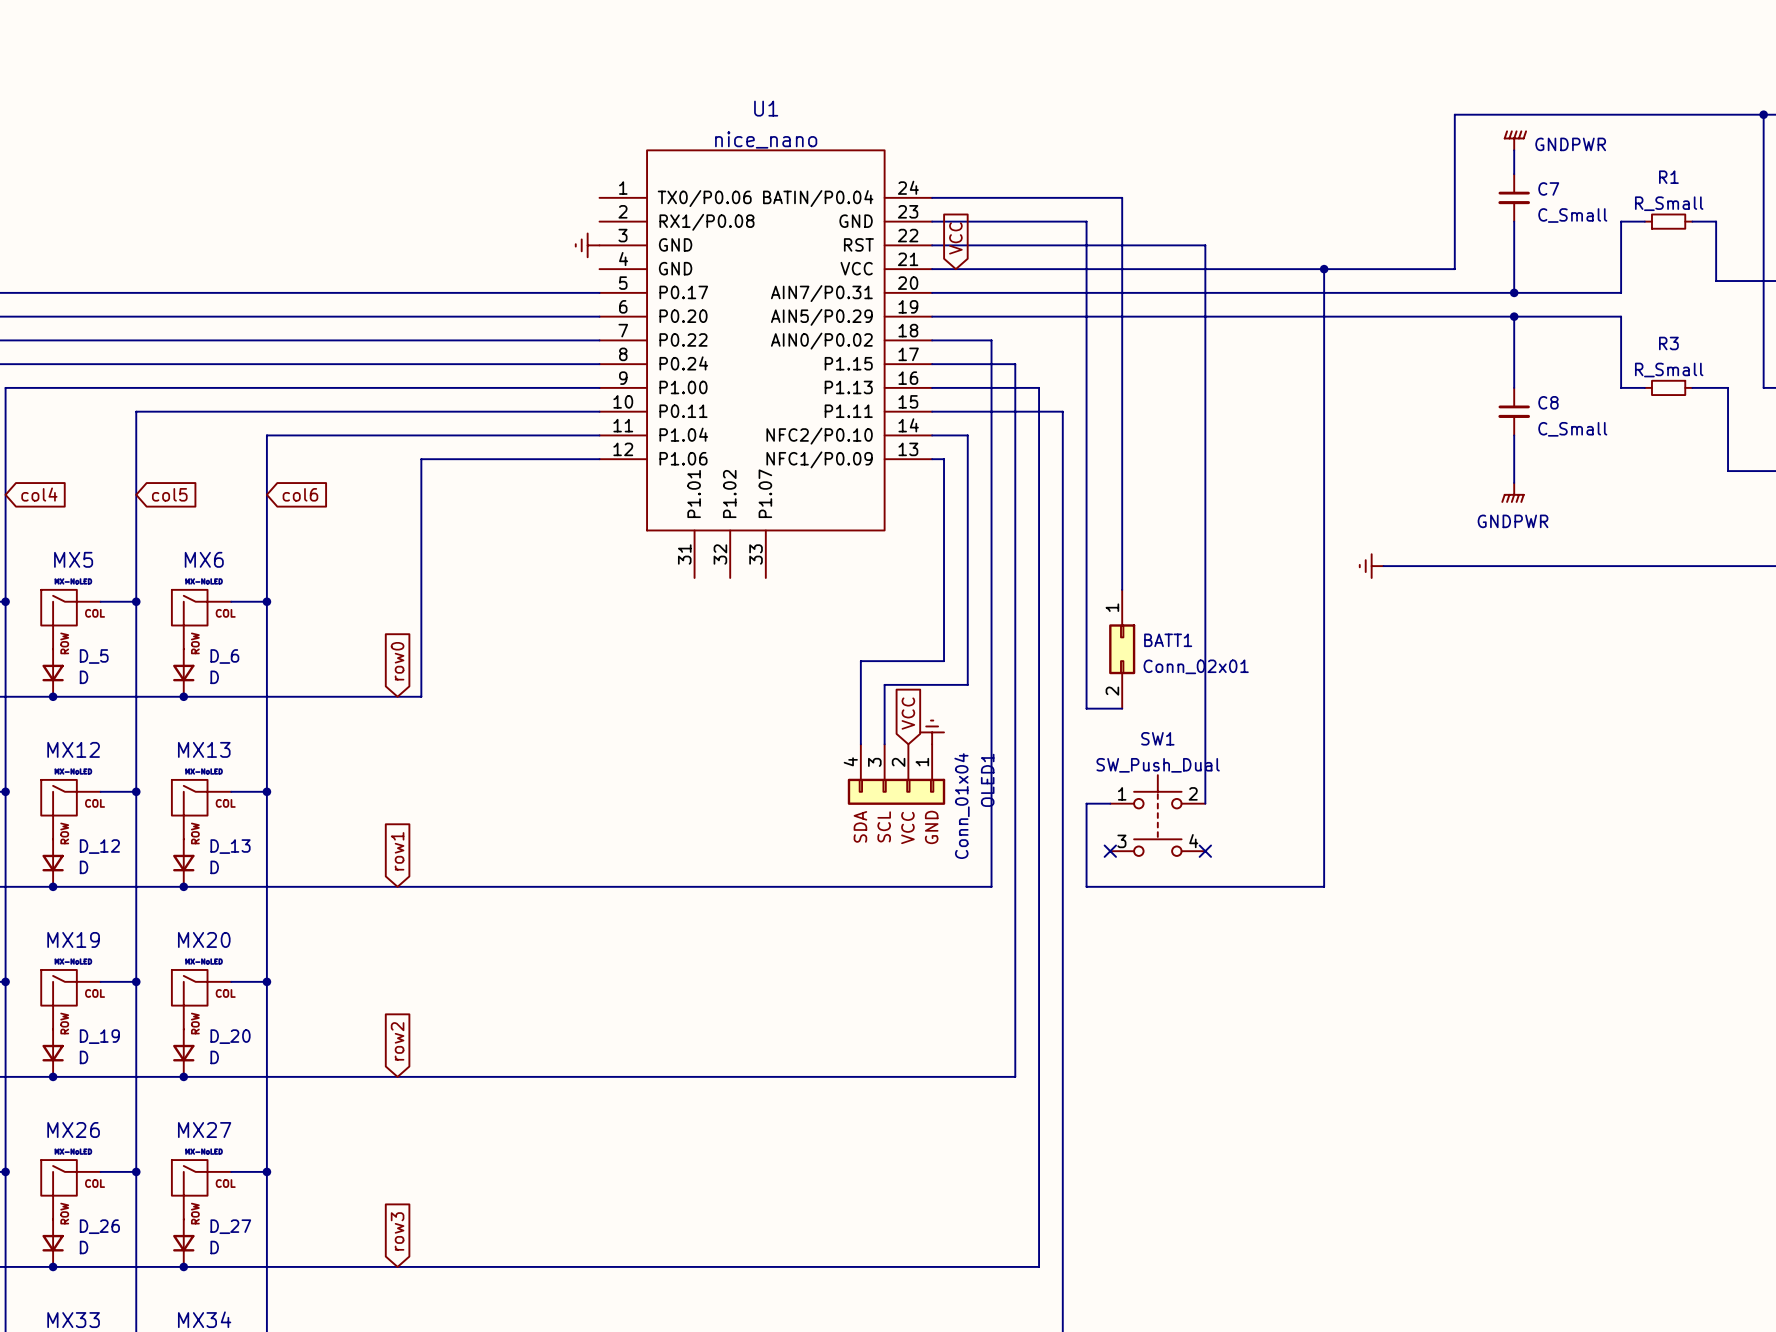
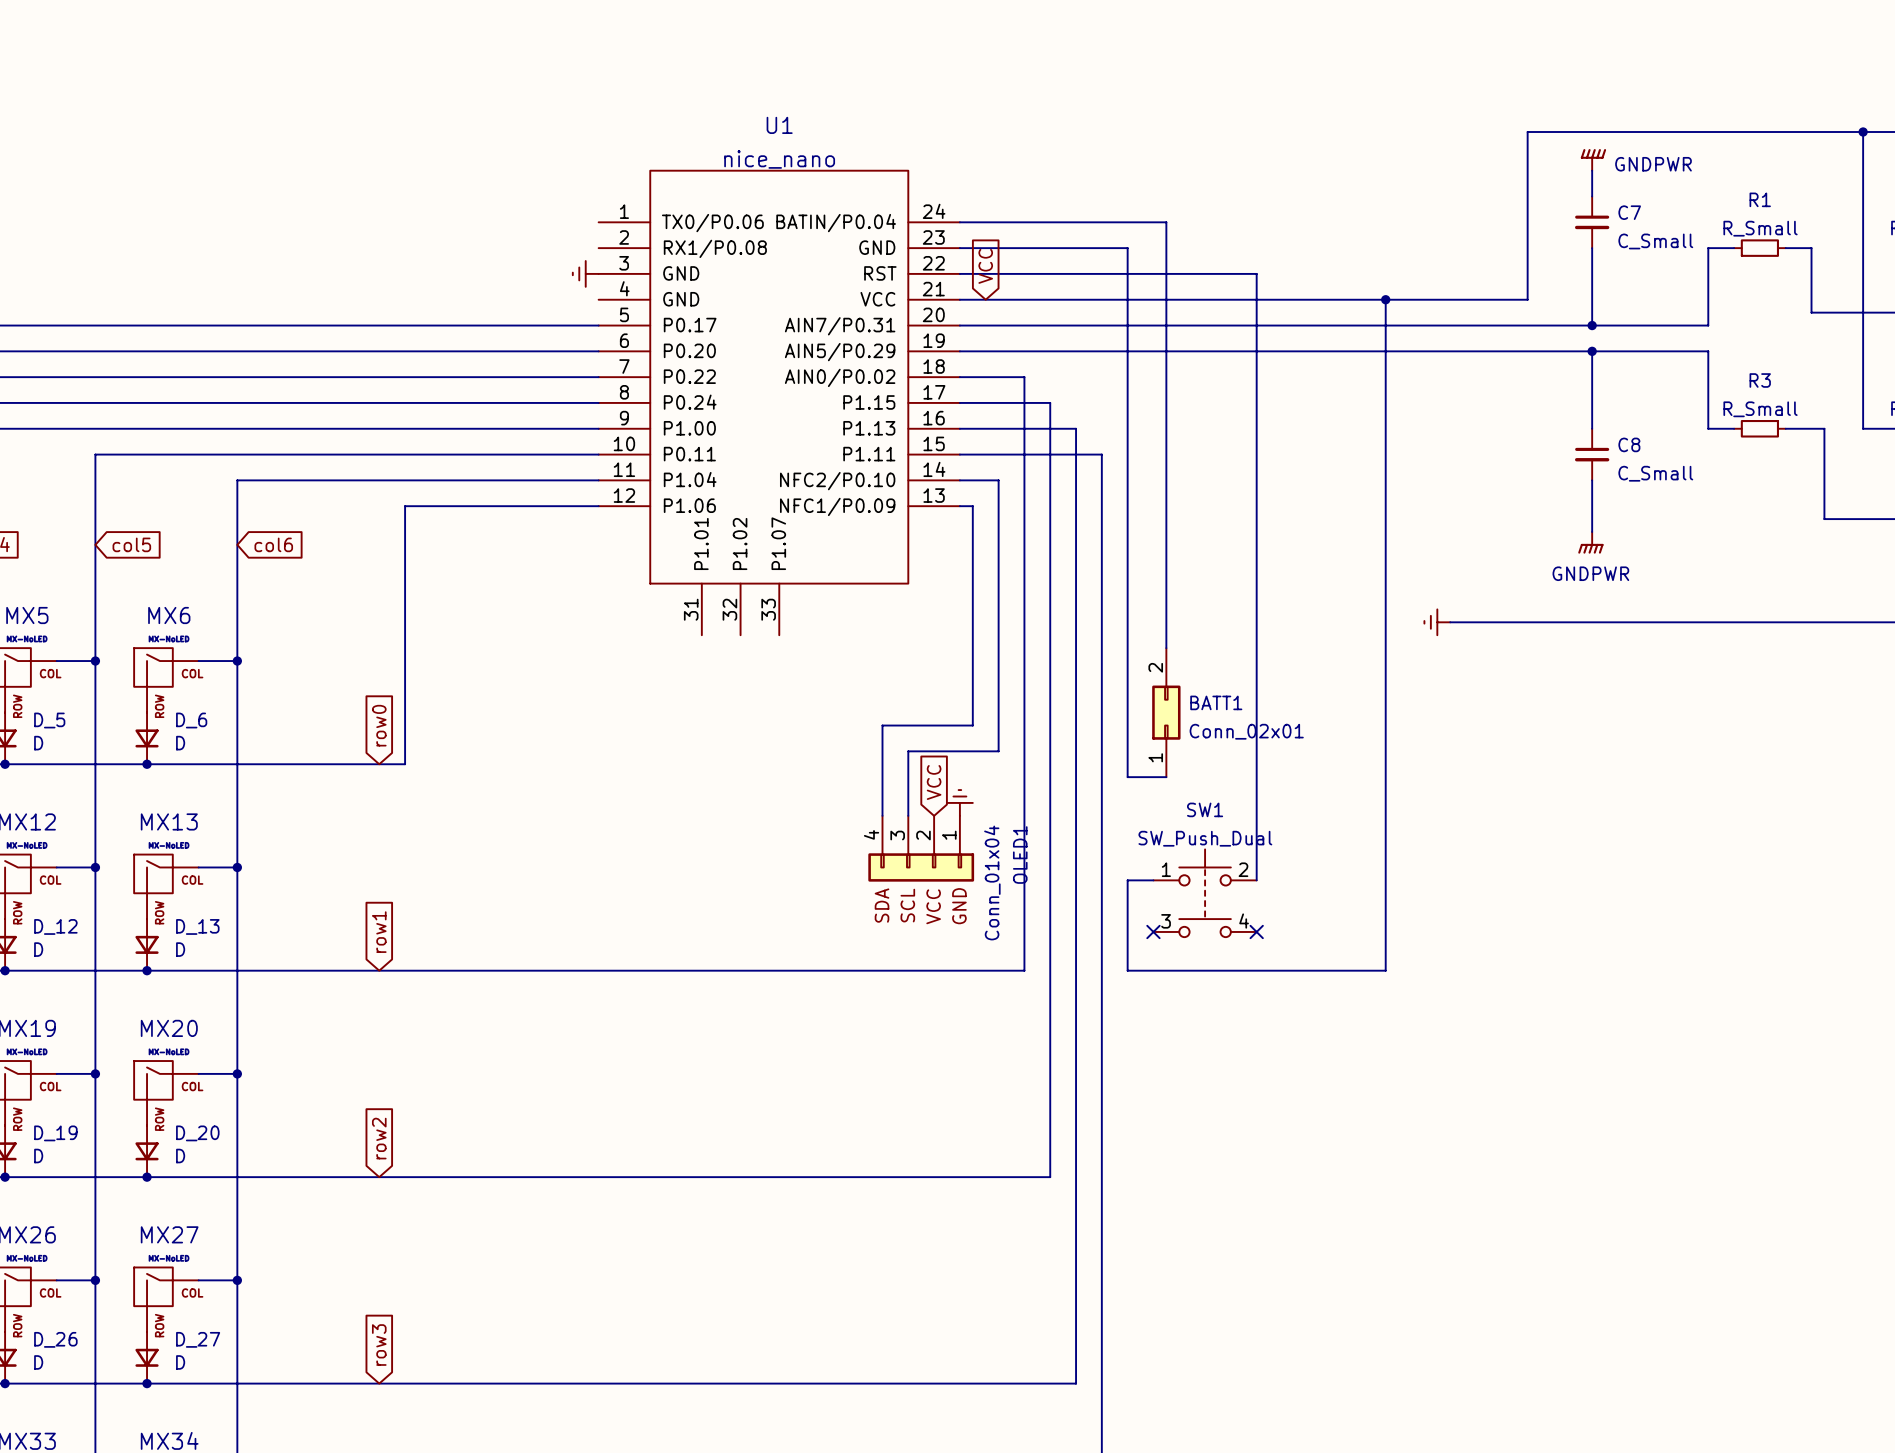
BATT1 rotation: 0° (1122, 649) -> 180° (1166, 712)

